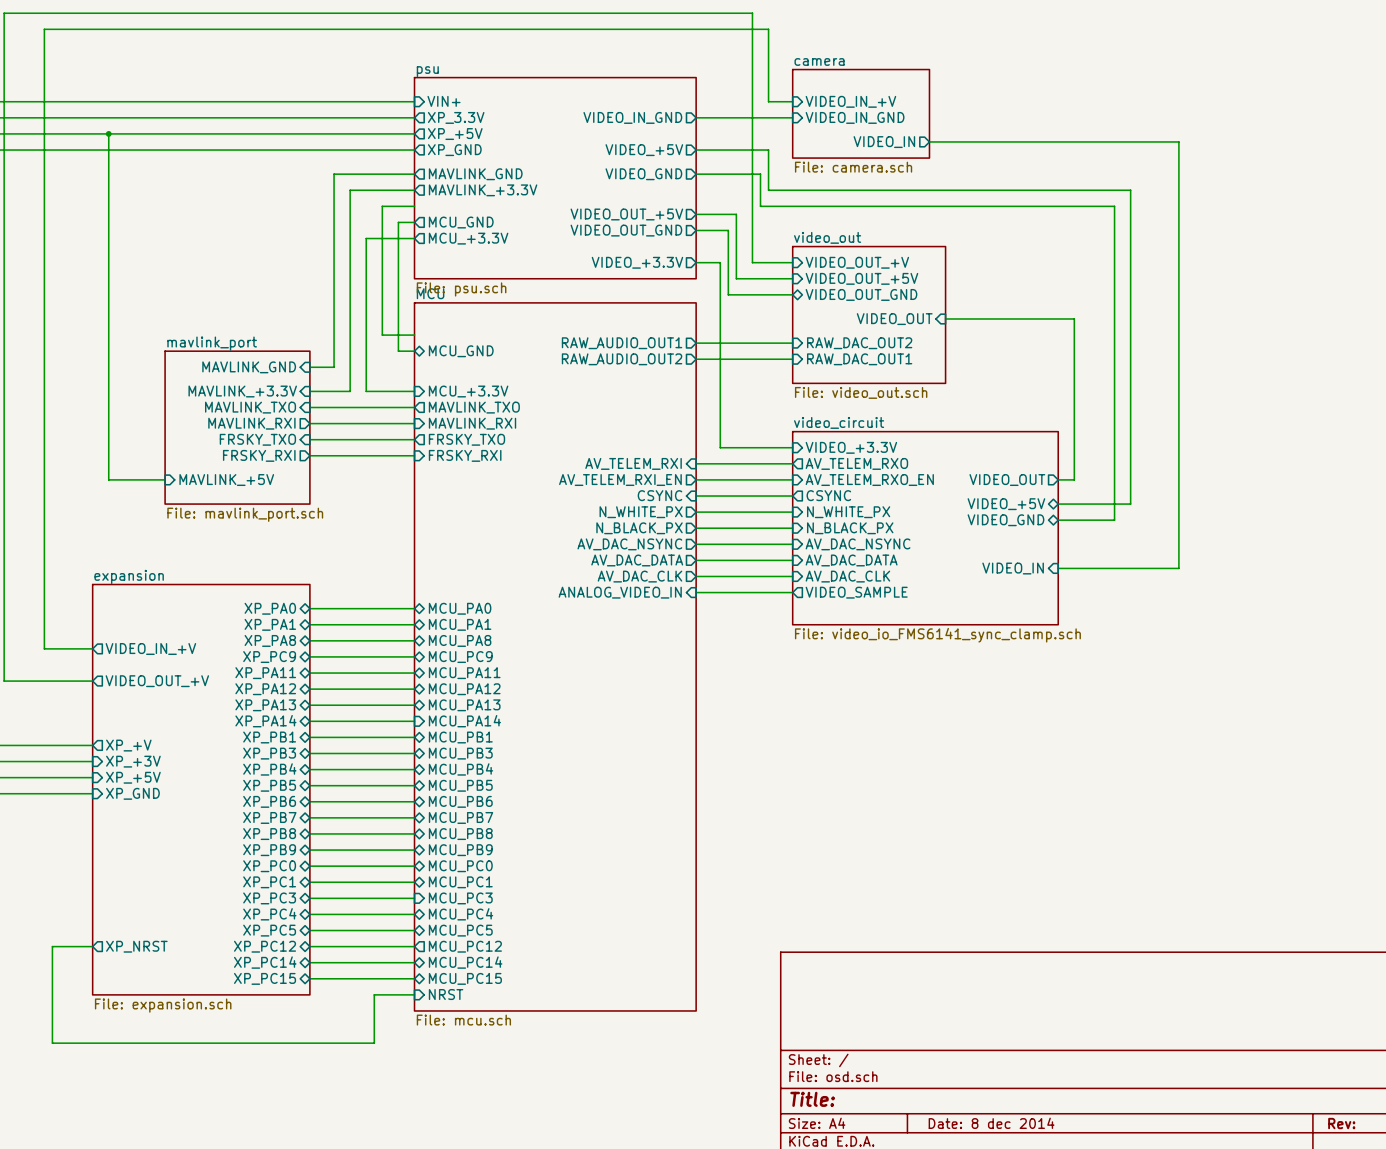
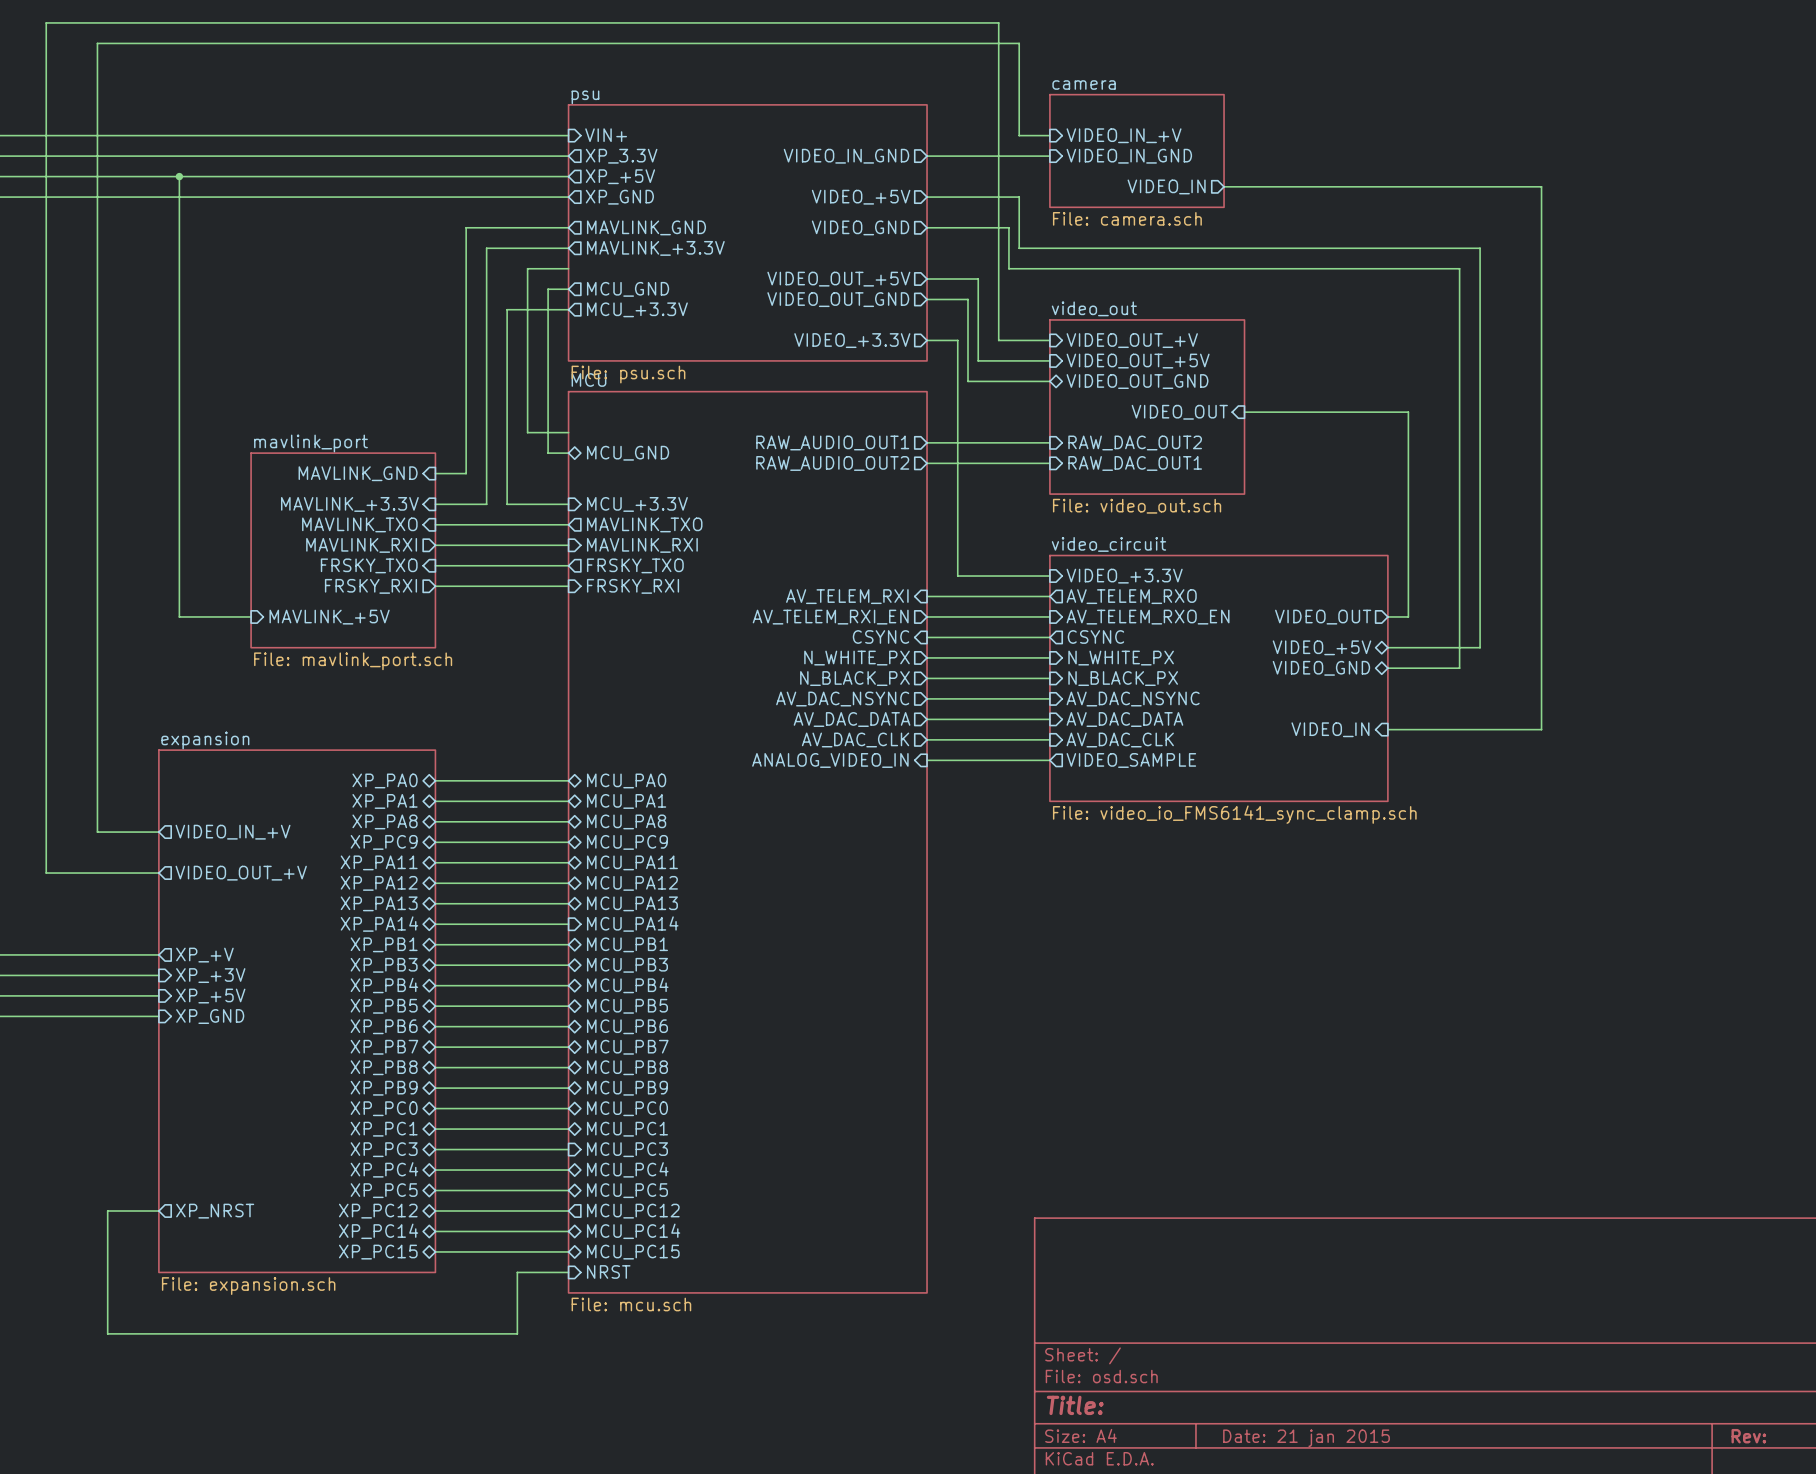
title block: Date: 8 dec 2014 (991, 1123) -> Date: 21 jan 2015 (1306, 1438)

